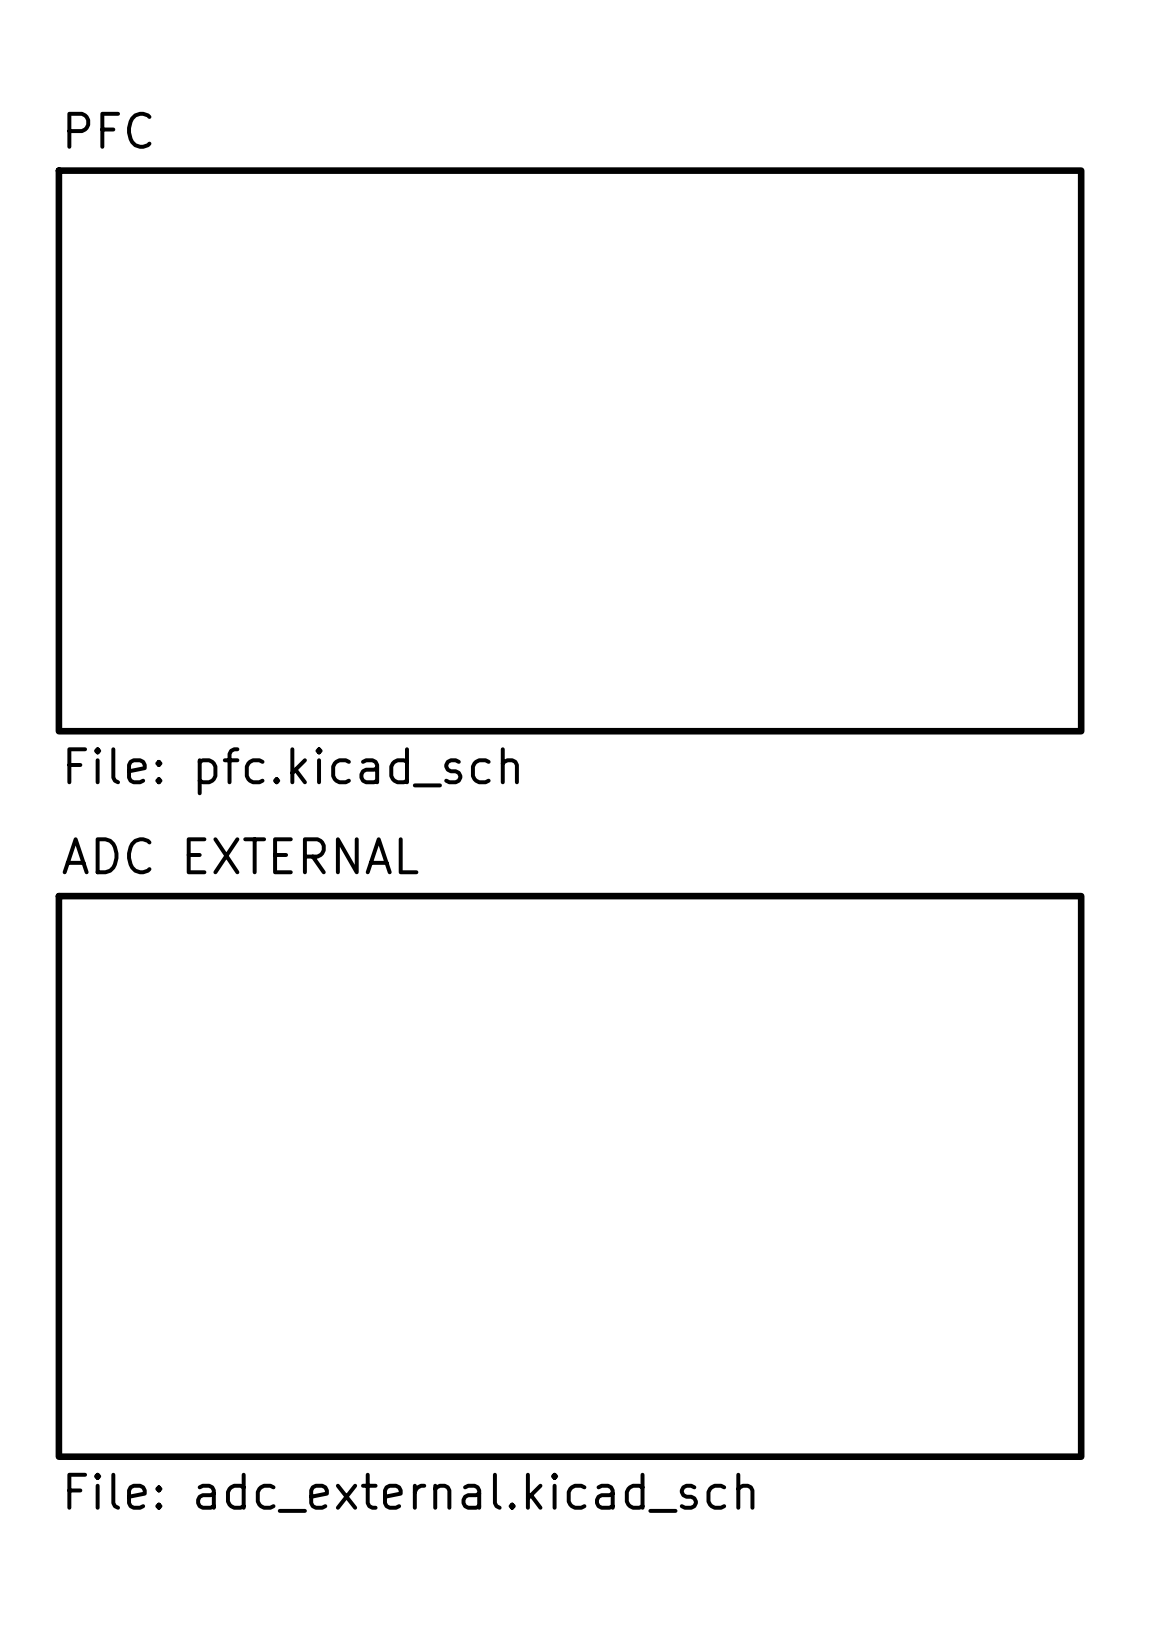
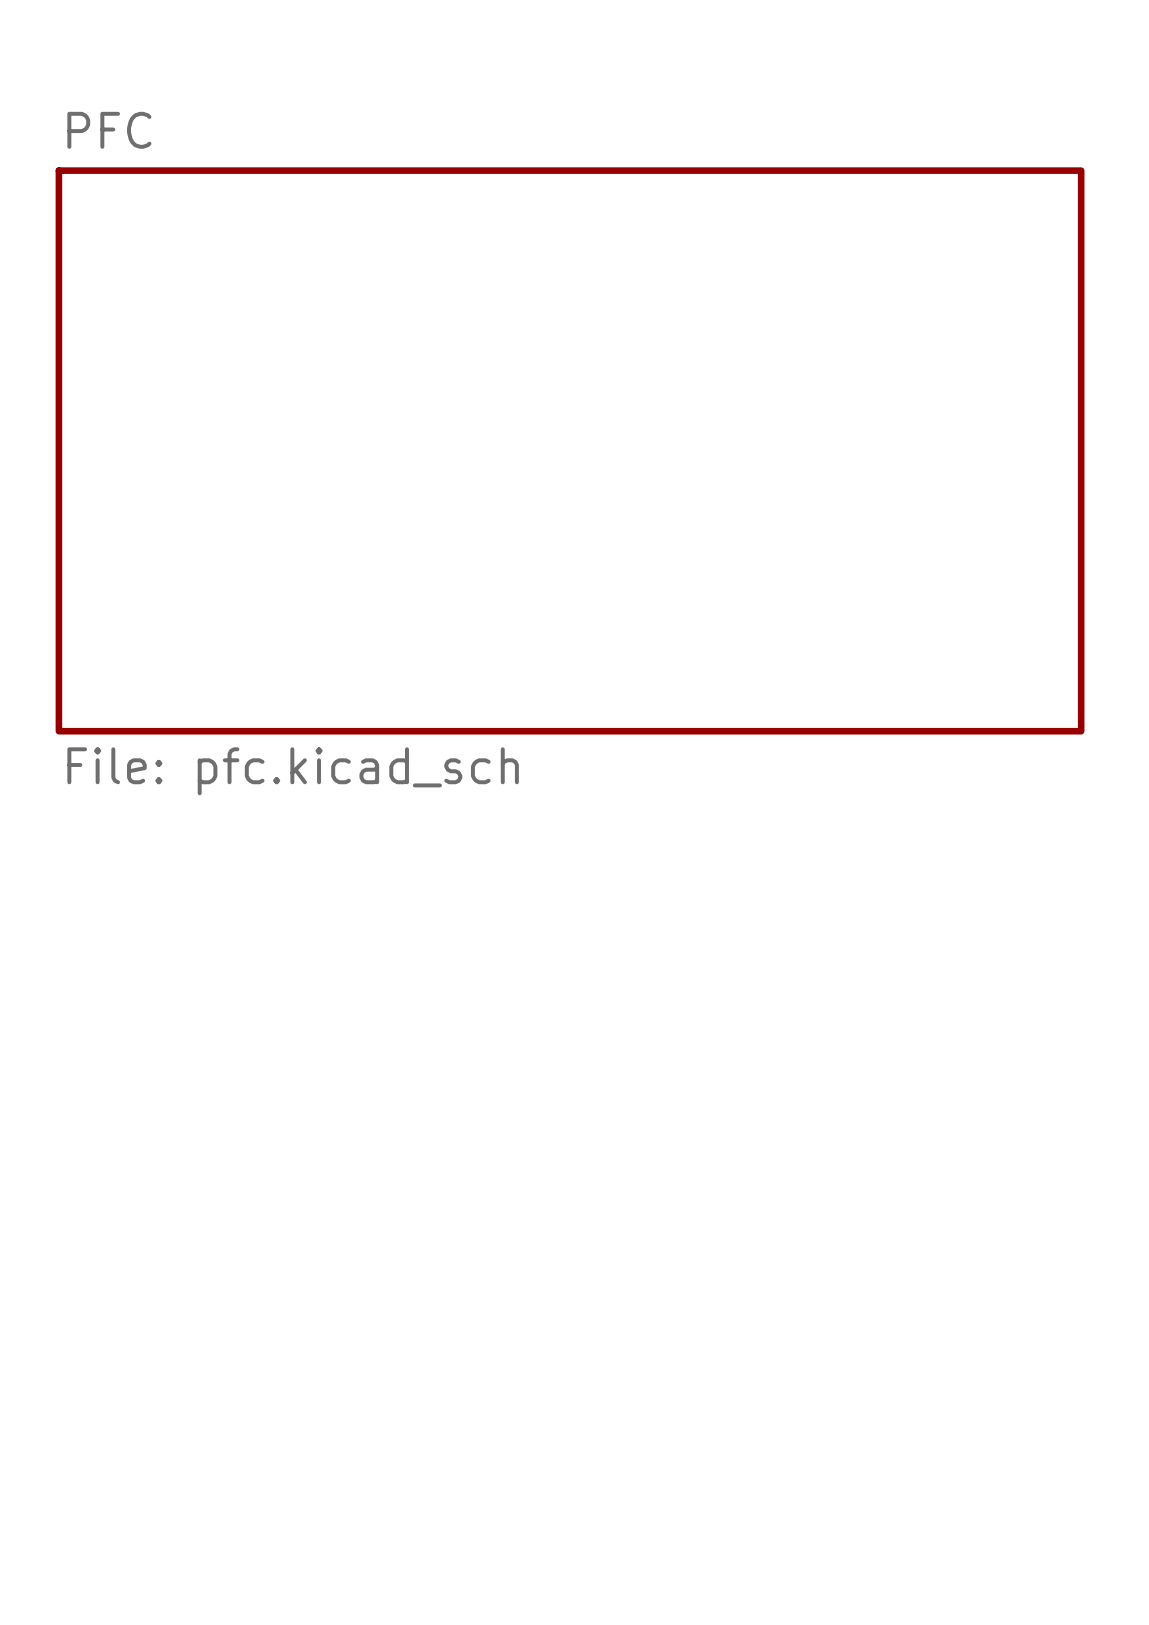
sheet ADC EXTERNAL: File: adc_external.kicad_sch (570, 1176) -> none

